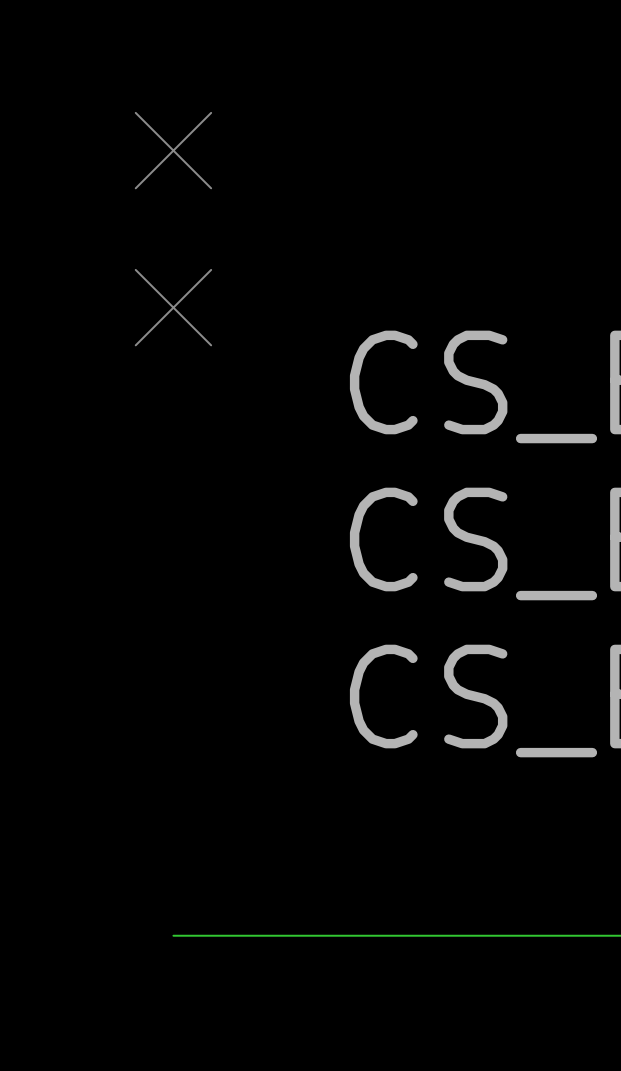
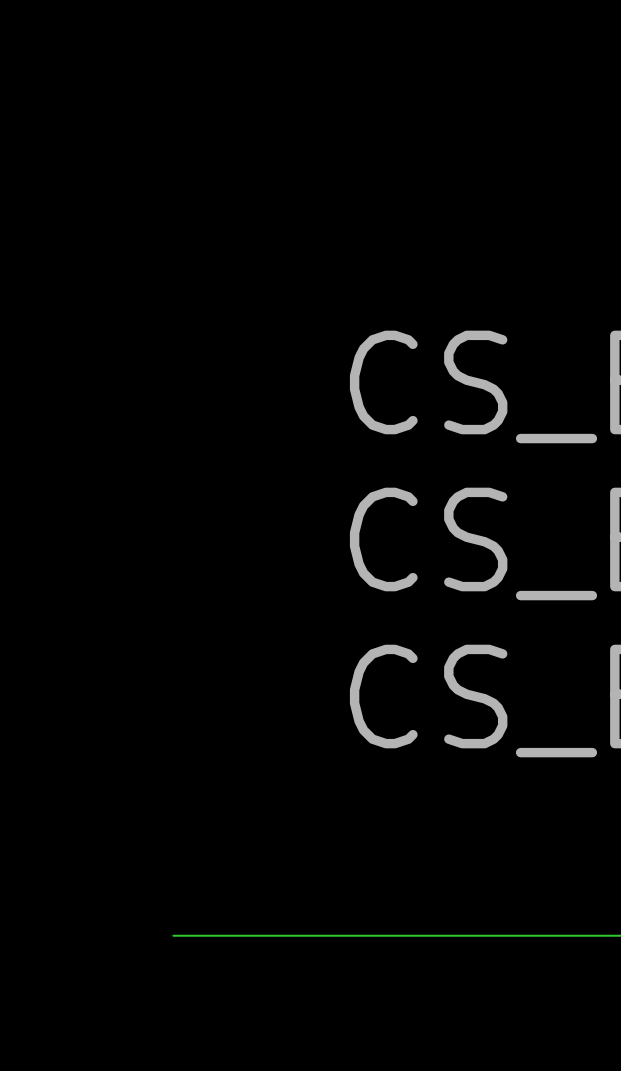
no-connect mark: (173, 150) -> none
no-connect mark: (173, 307) -> none

